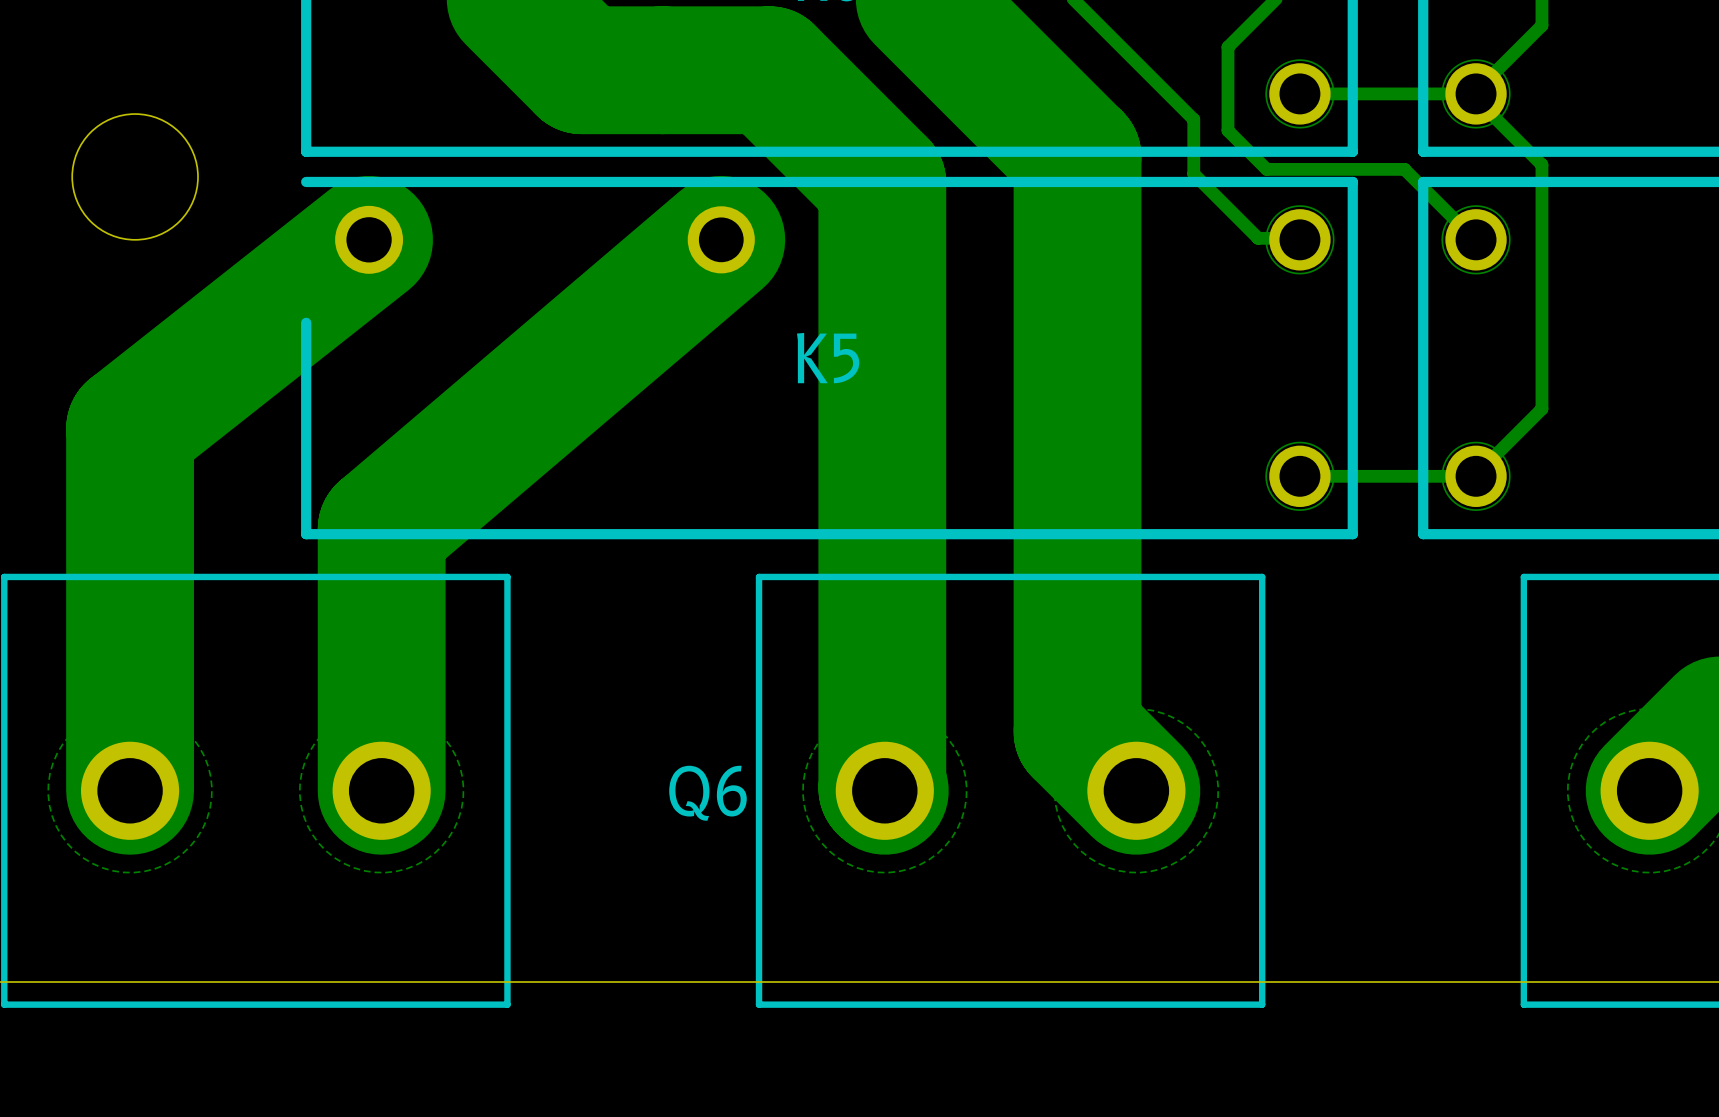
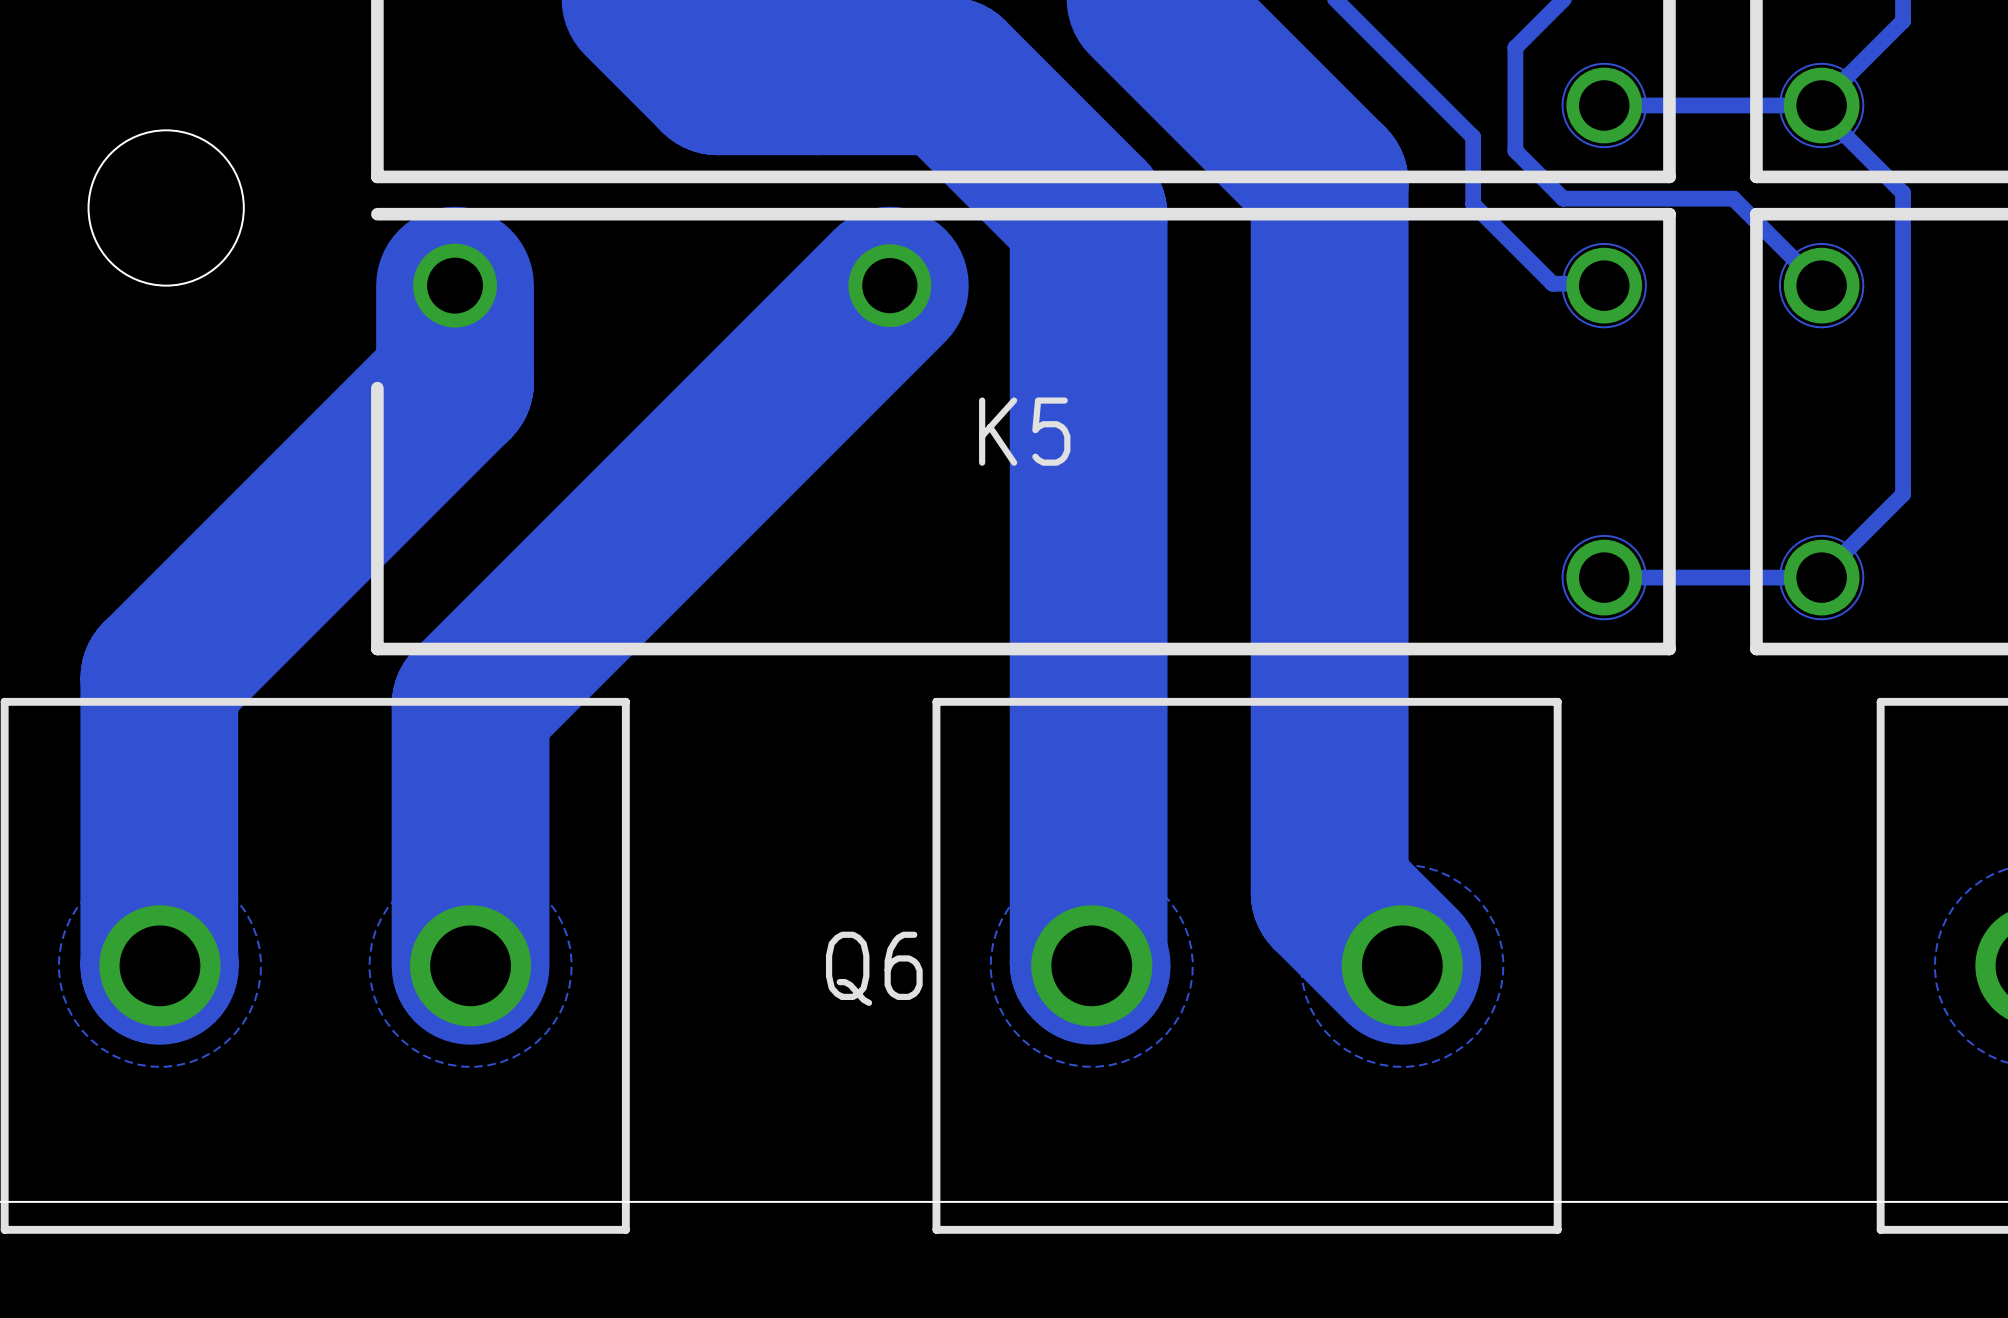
bottom track: (369, 239) (130, 428) (130, 790) -> (455, 285) (455, 382) (159, 678) (159, 965)
bottom track: (721, 239) (381, 529) (381, 579) -> (889, 285) (470, 704)

